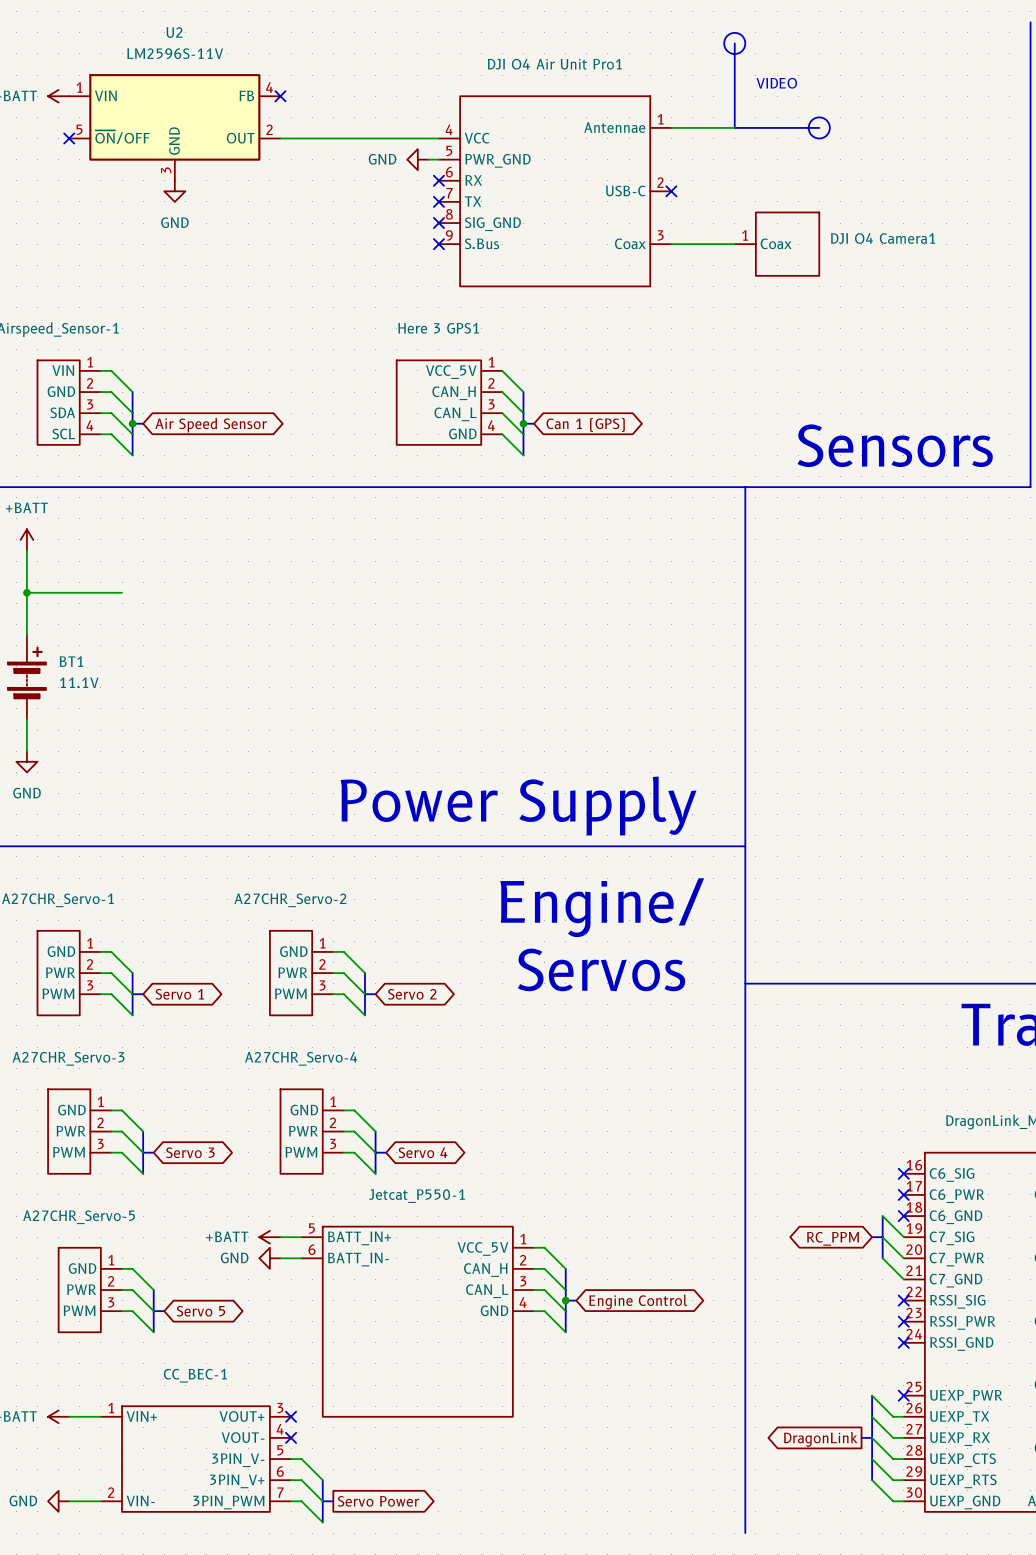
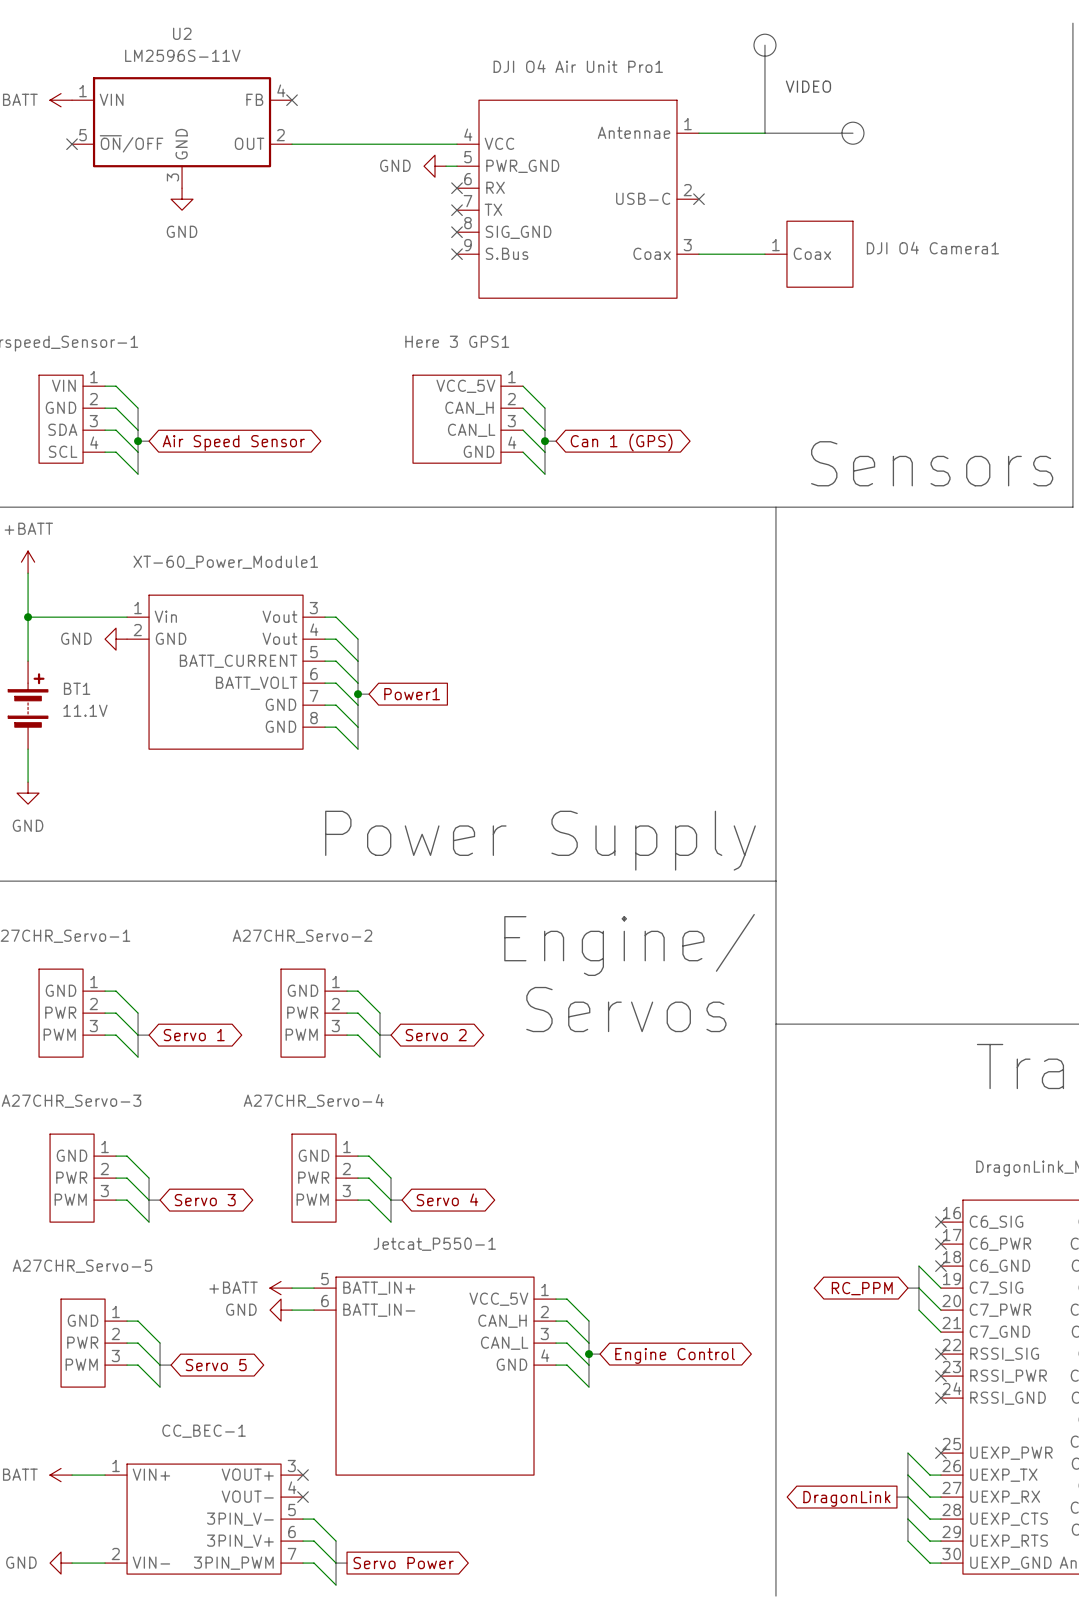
wire: none -> (325, 617) (336, 617) (358, 639)
power symbol: none -> GND (116, 639)
wire: none -> (325, 639) (336, 639) (358, 661)
bus: none -> (358, 639) (358, 749)
wire: none -> (325, 661) (336, 661) (358, 683)
XT-60_Power_Module1: none -> (226, 672)
wire: none -> (325, 683) (336, 683) (358, 705)
bus: none -> (358, 694) (369, 694)
junction: none -> (358, 694)
global label: none -> Power1 (412, 694)
wire: none -> (325, 705) (336, 705) (358, 727)
wire: none -> (325, 727) (336, 727) (358, 749)

